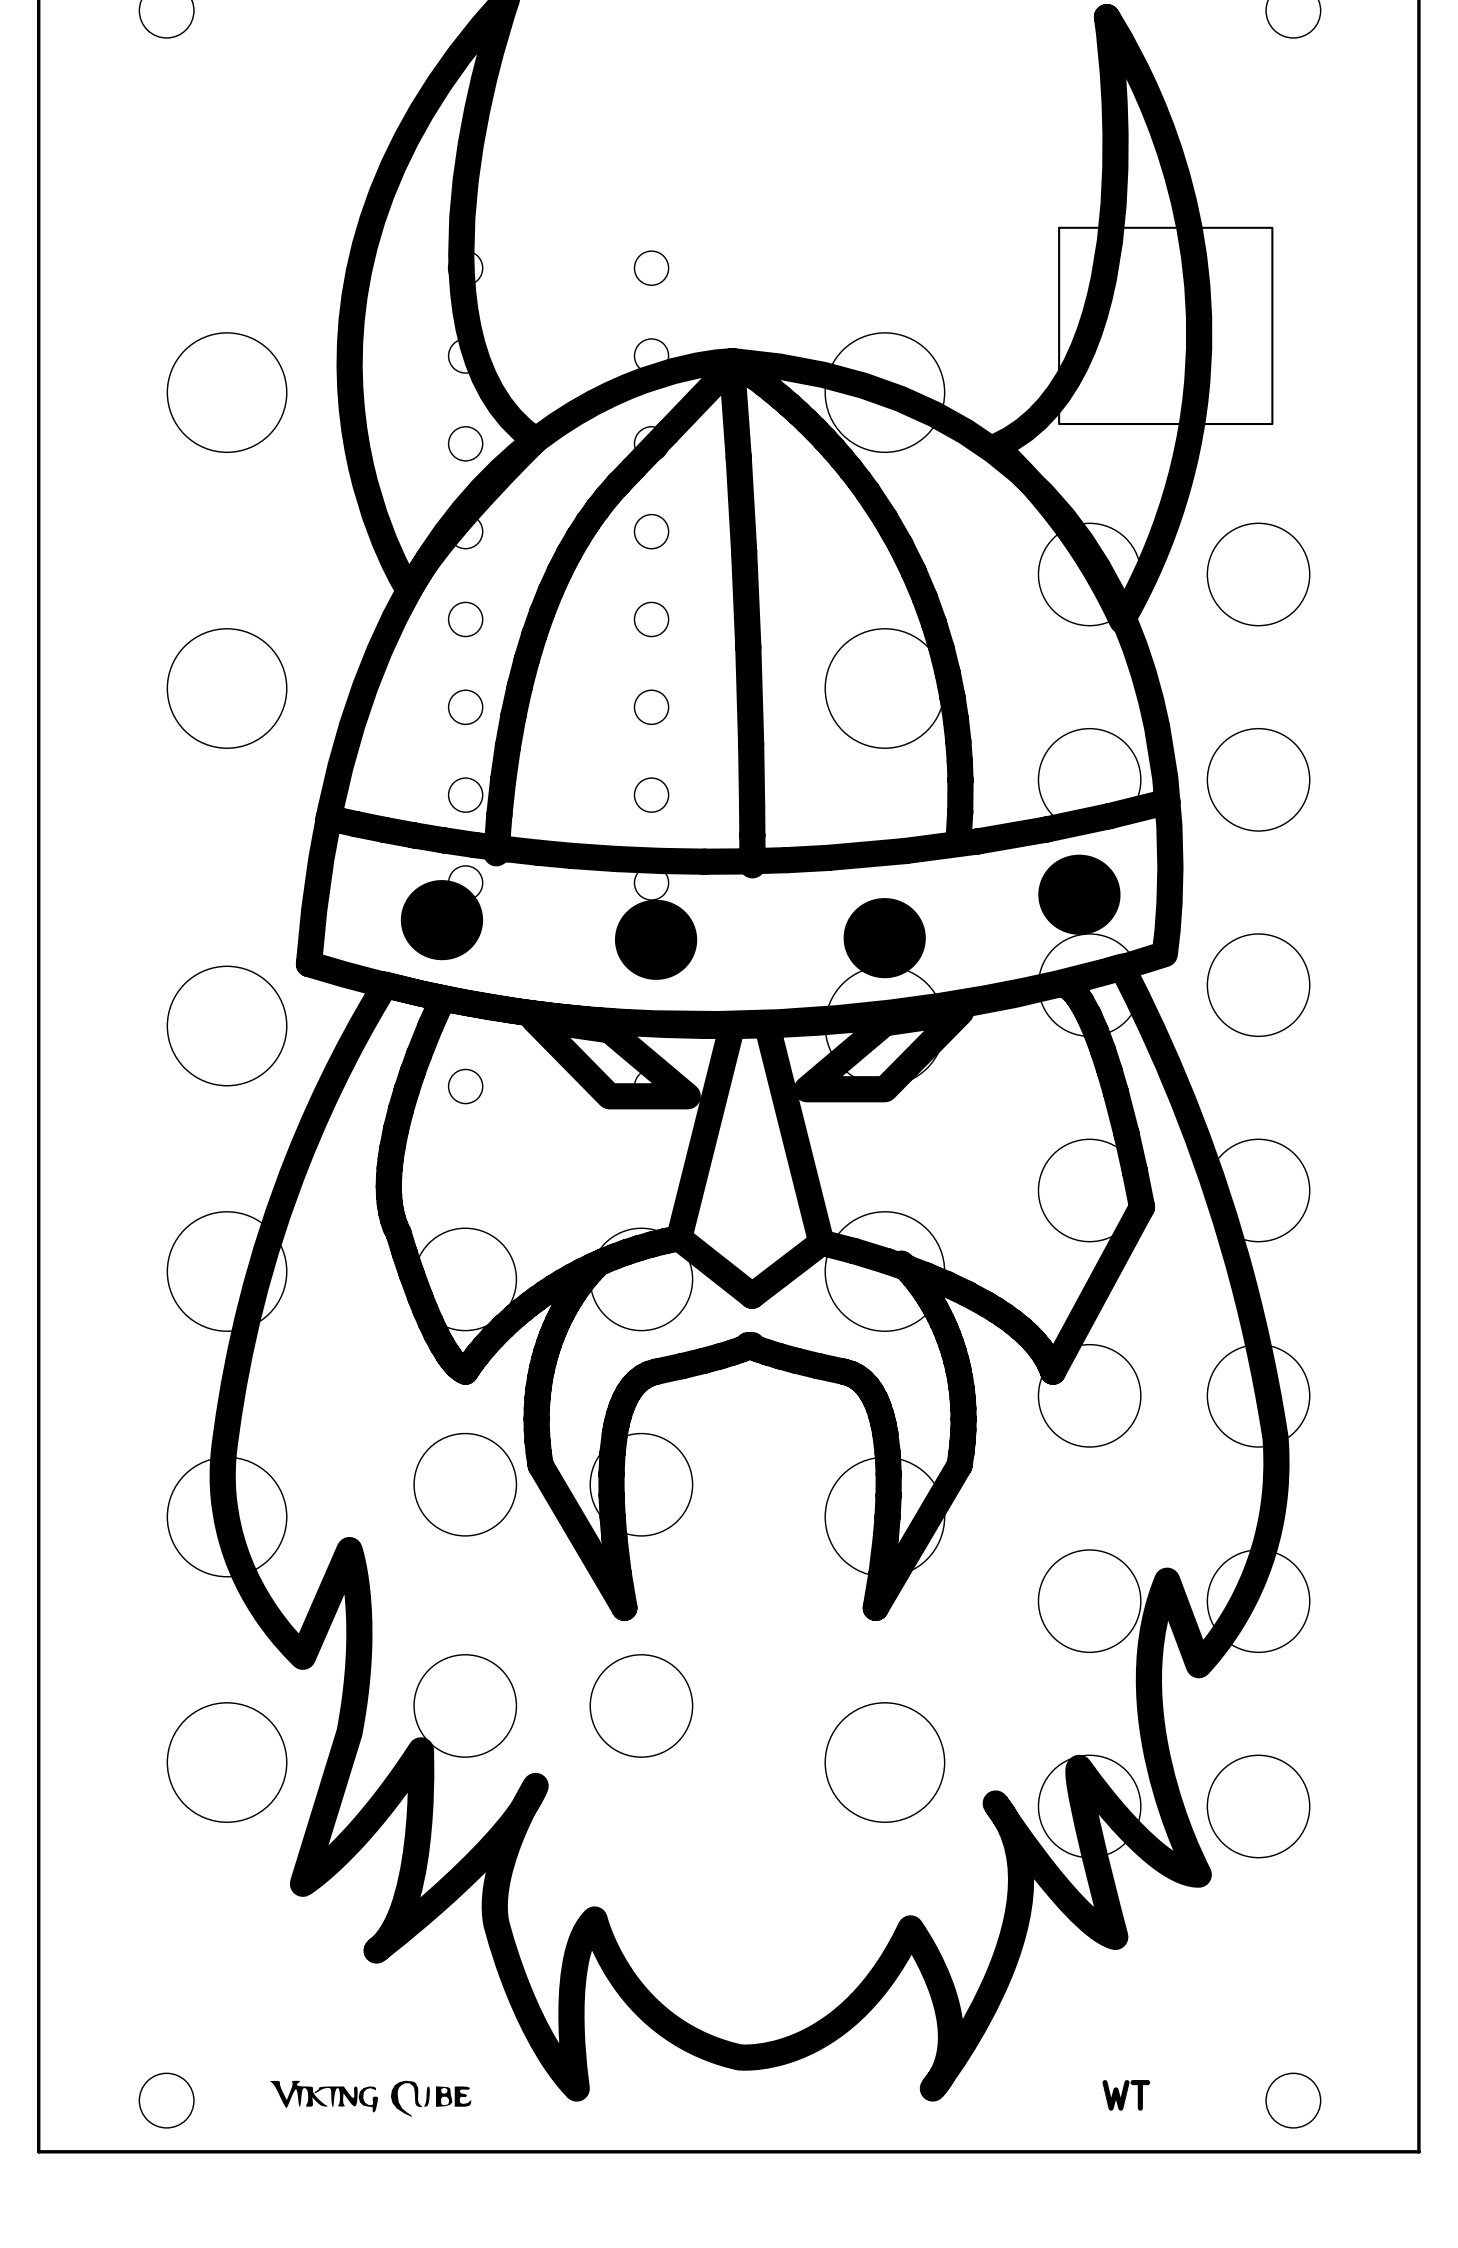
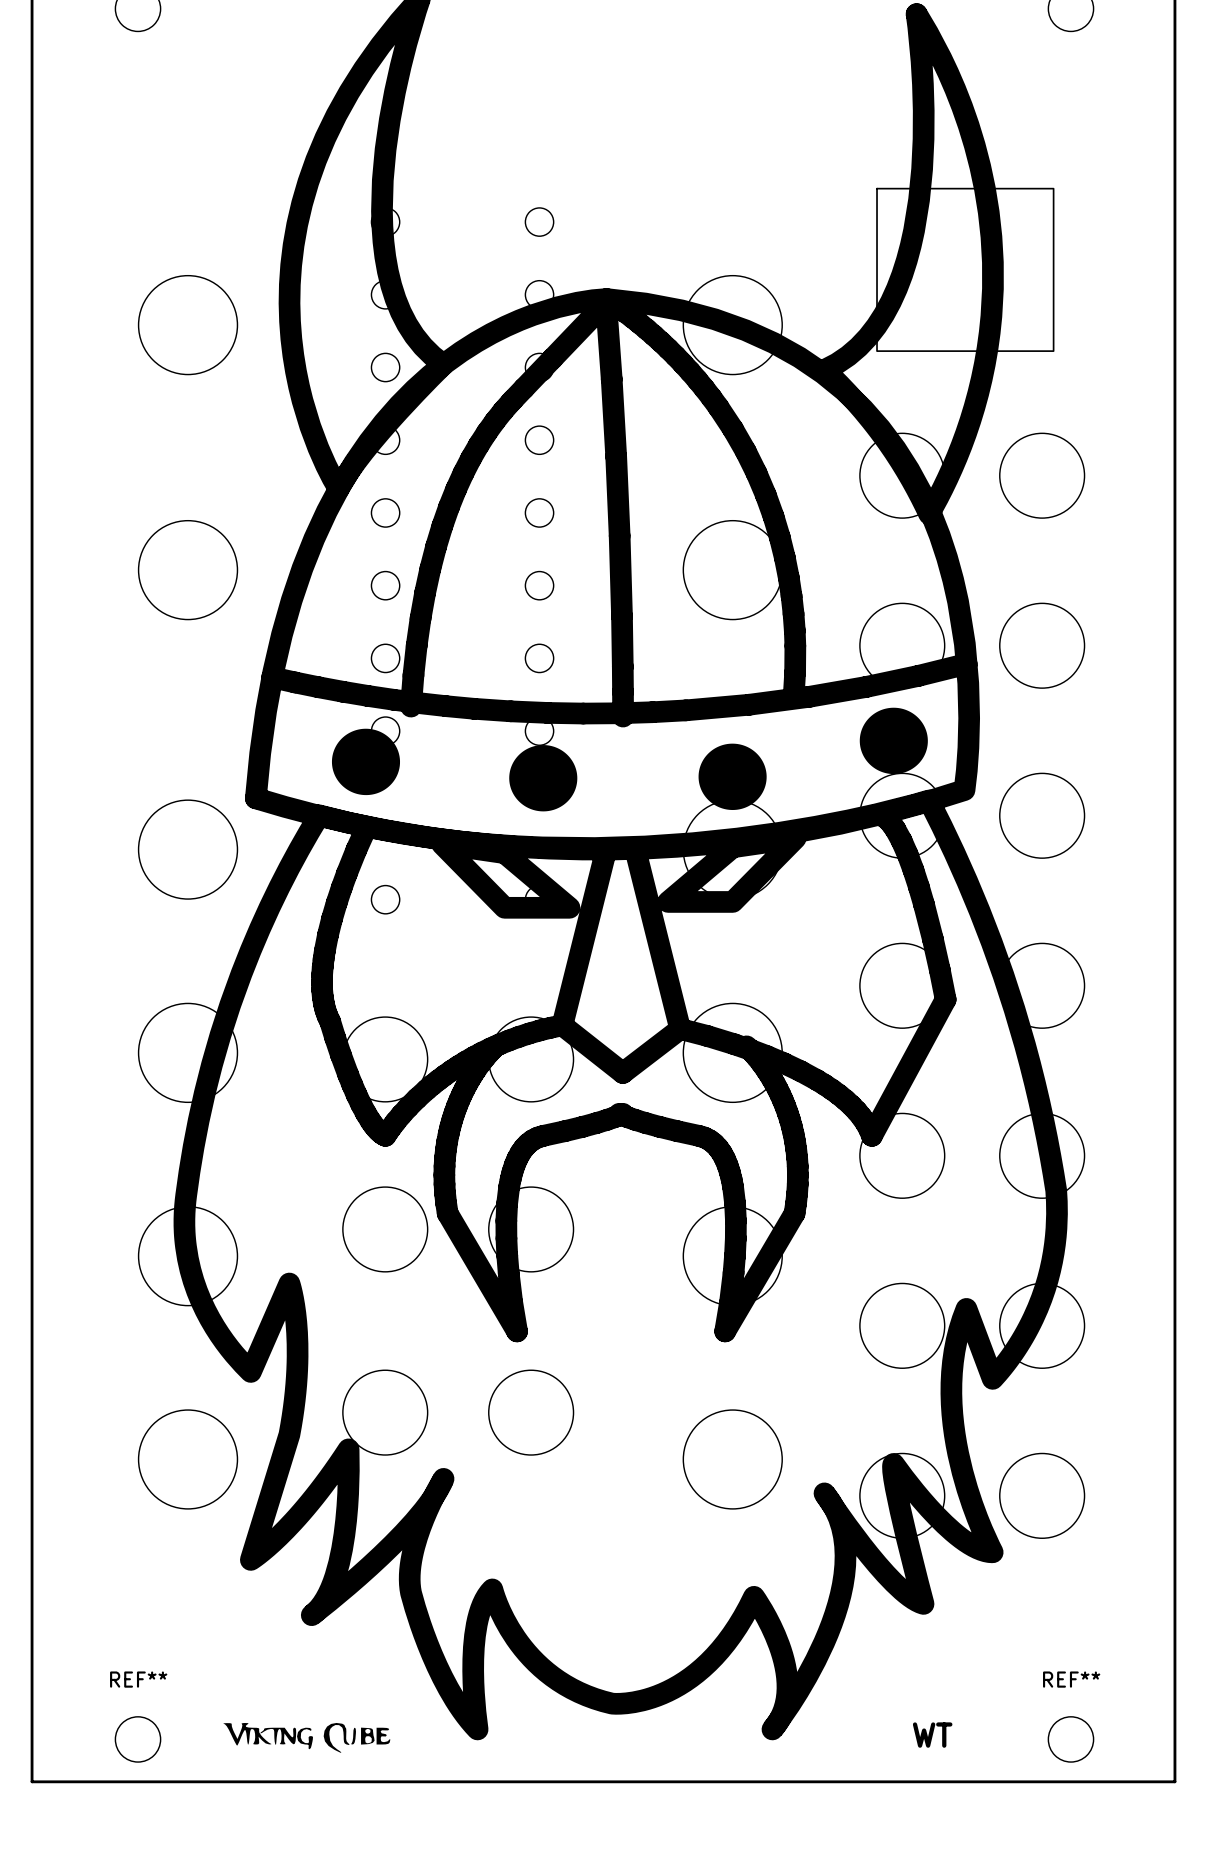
REF** name: none -> REF** (138, 1679)
REF** name: none -> REF** (1071, 1679)

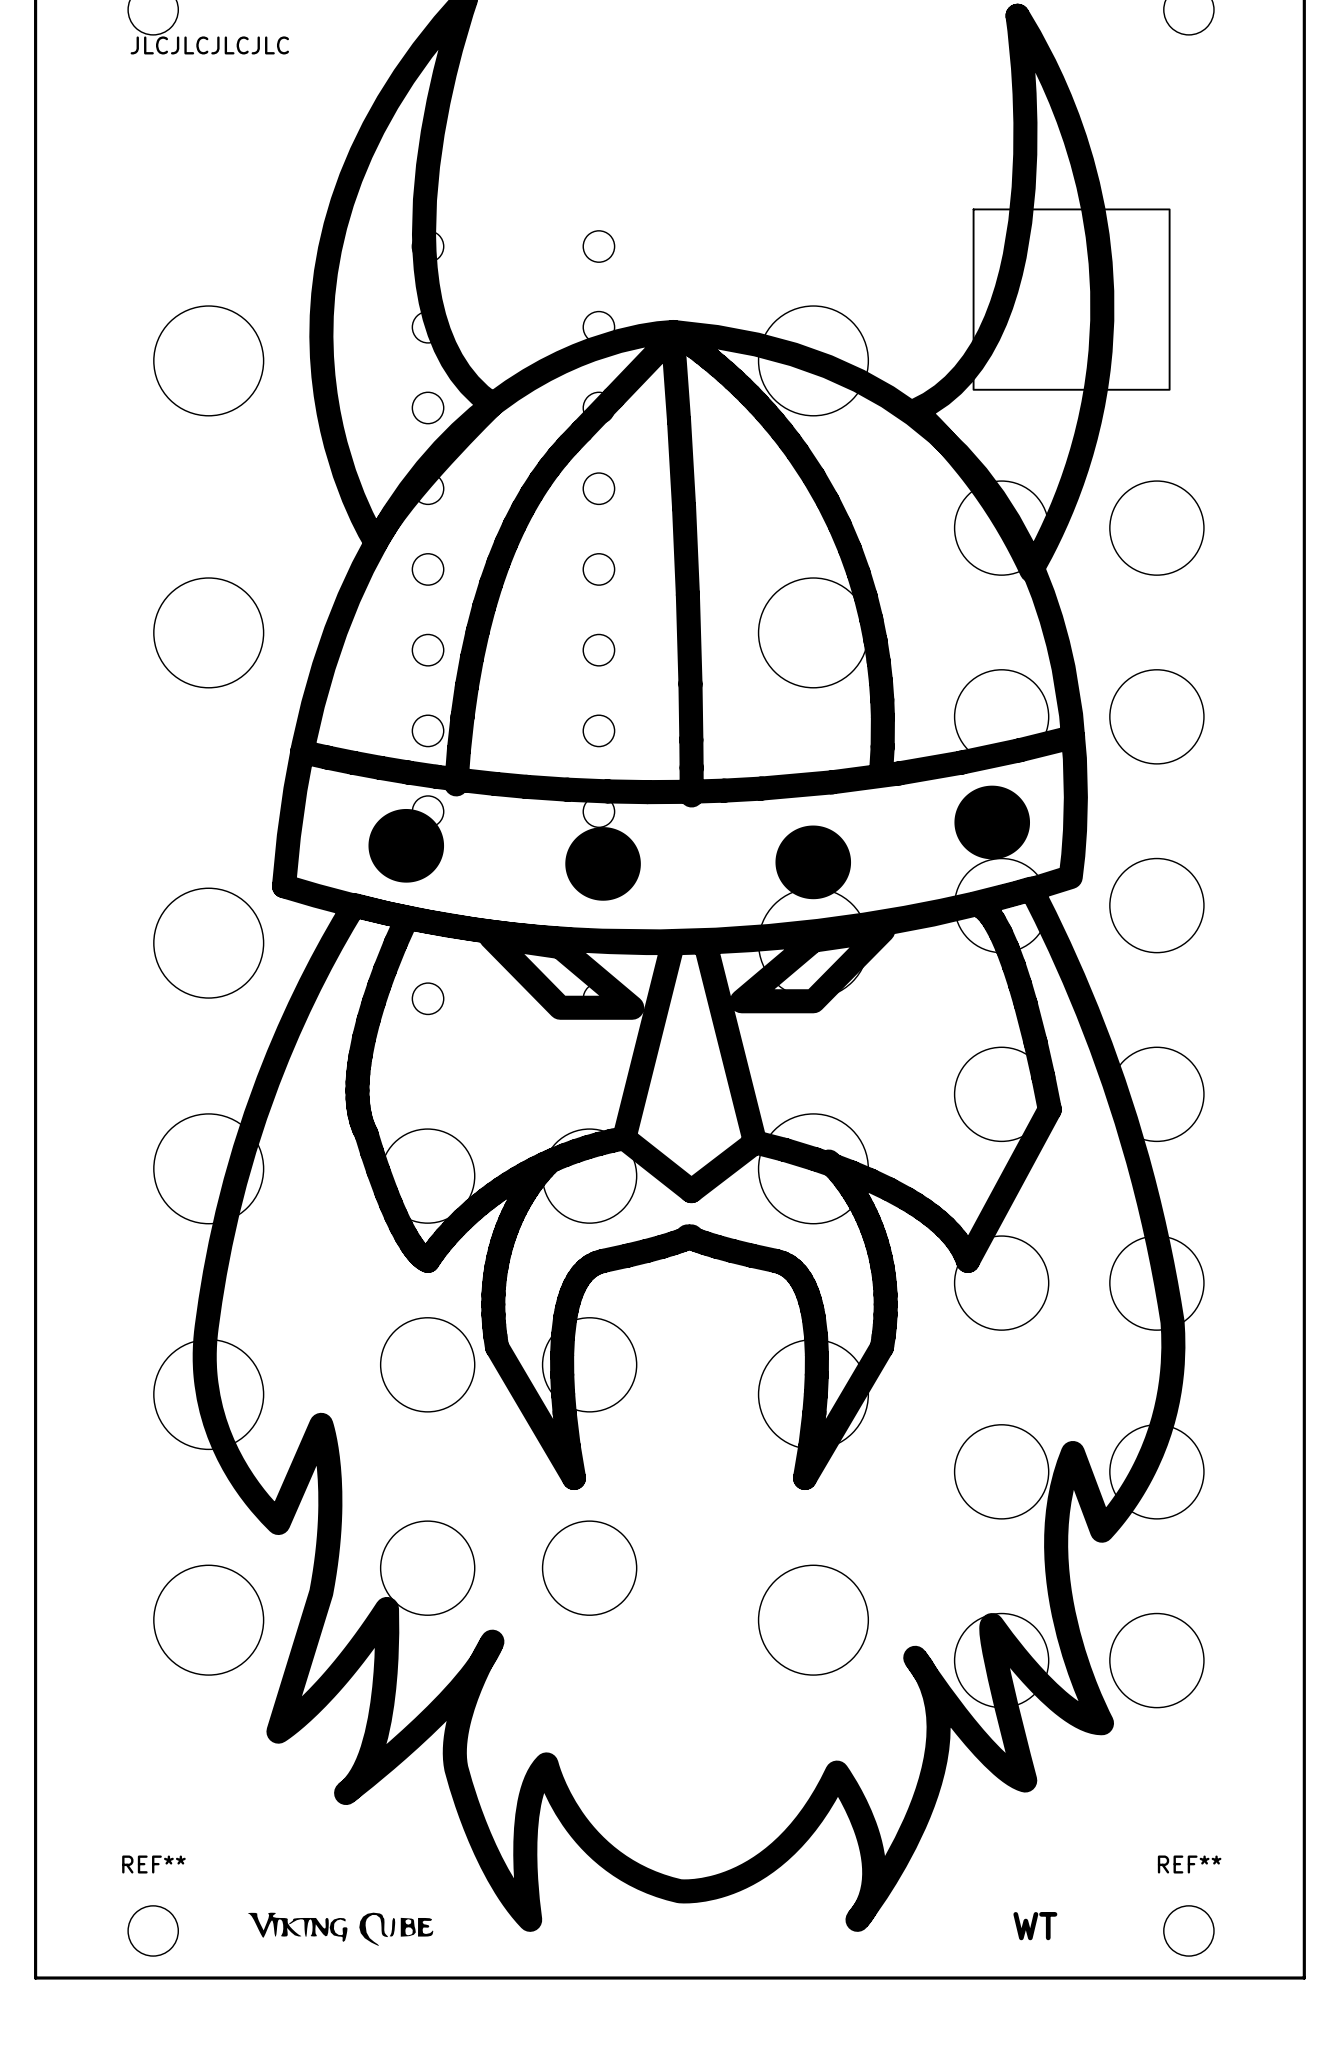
drawing: none -> [130, 36, 290, 55]

